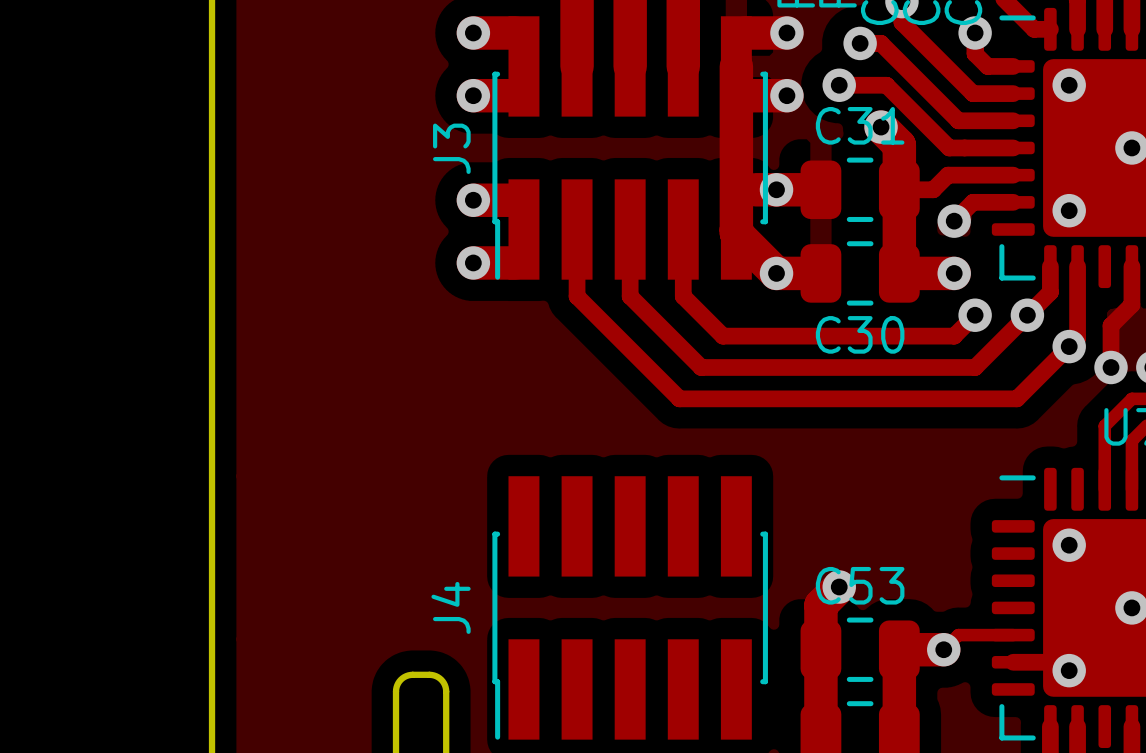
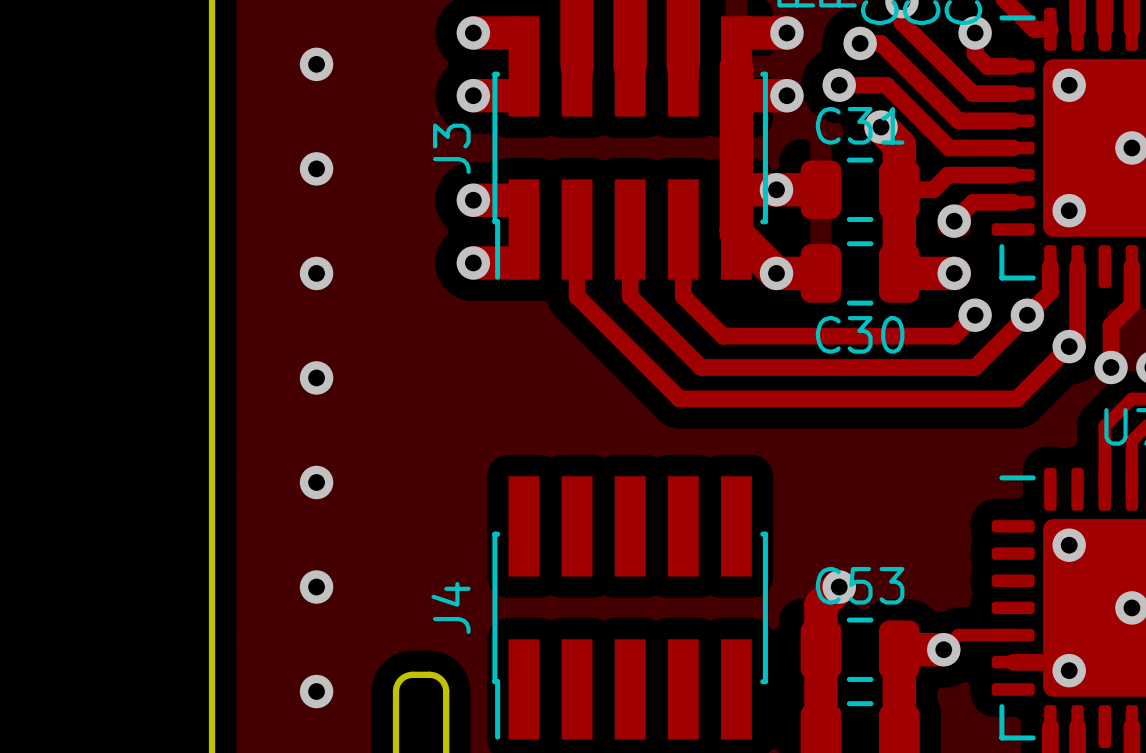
via: none -> (316, 64)
via: none -> (316, 168)
via: none -> (316, 273)
via: none -> (316, 377)
via: none -> (316, 482)
via: none -> (316, 587)
via: none -> (316, 691)

